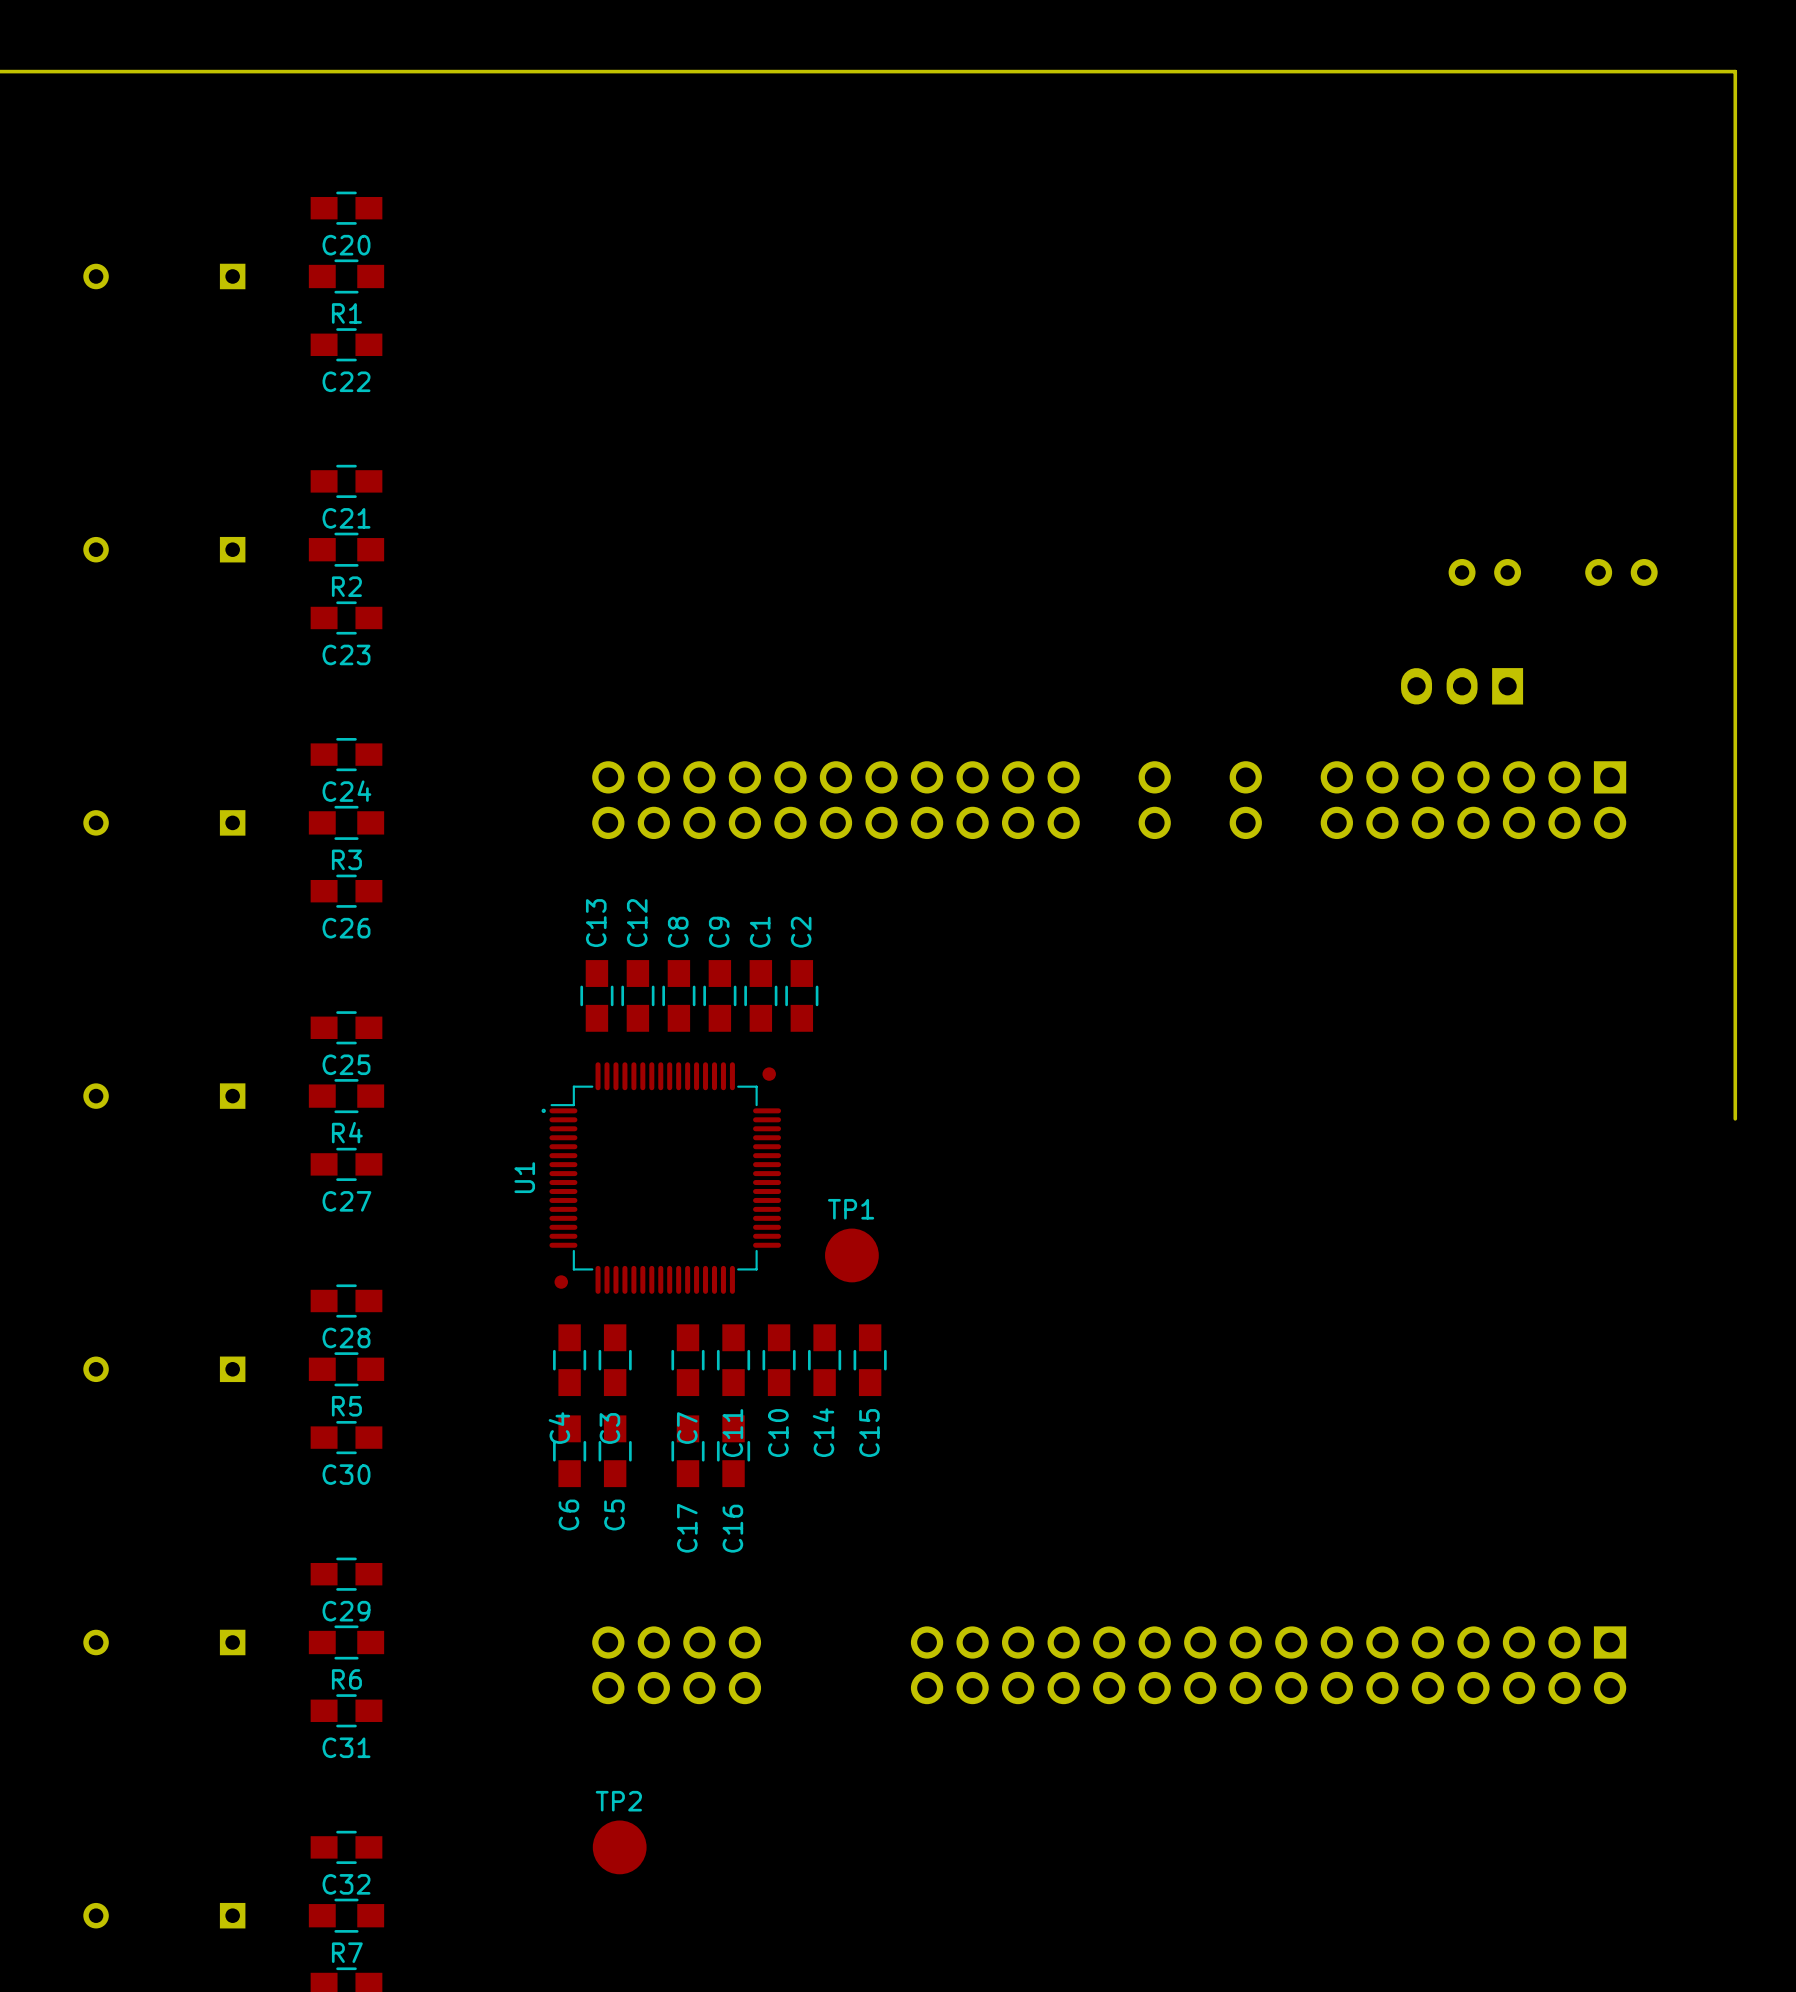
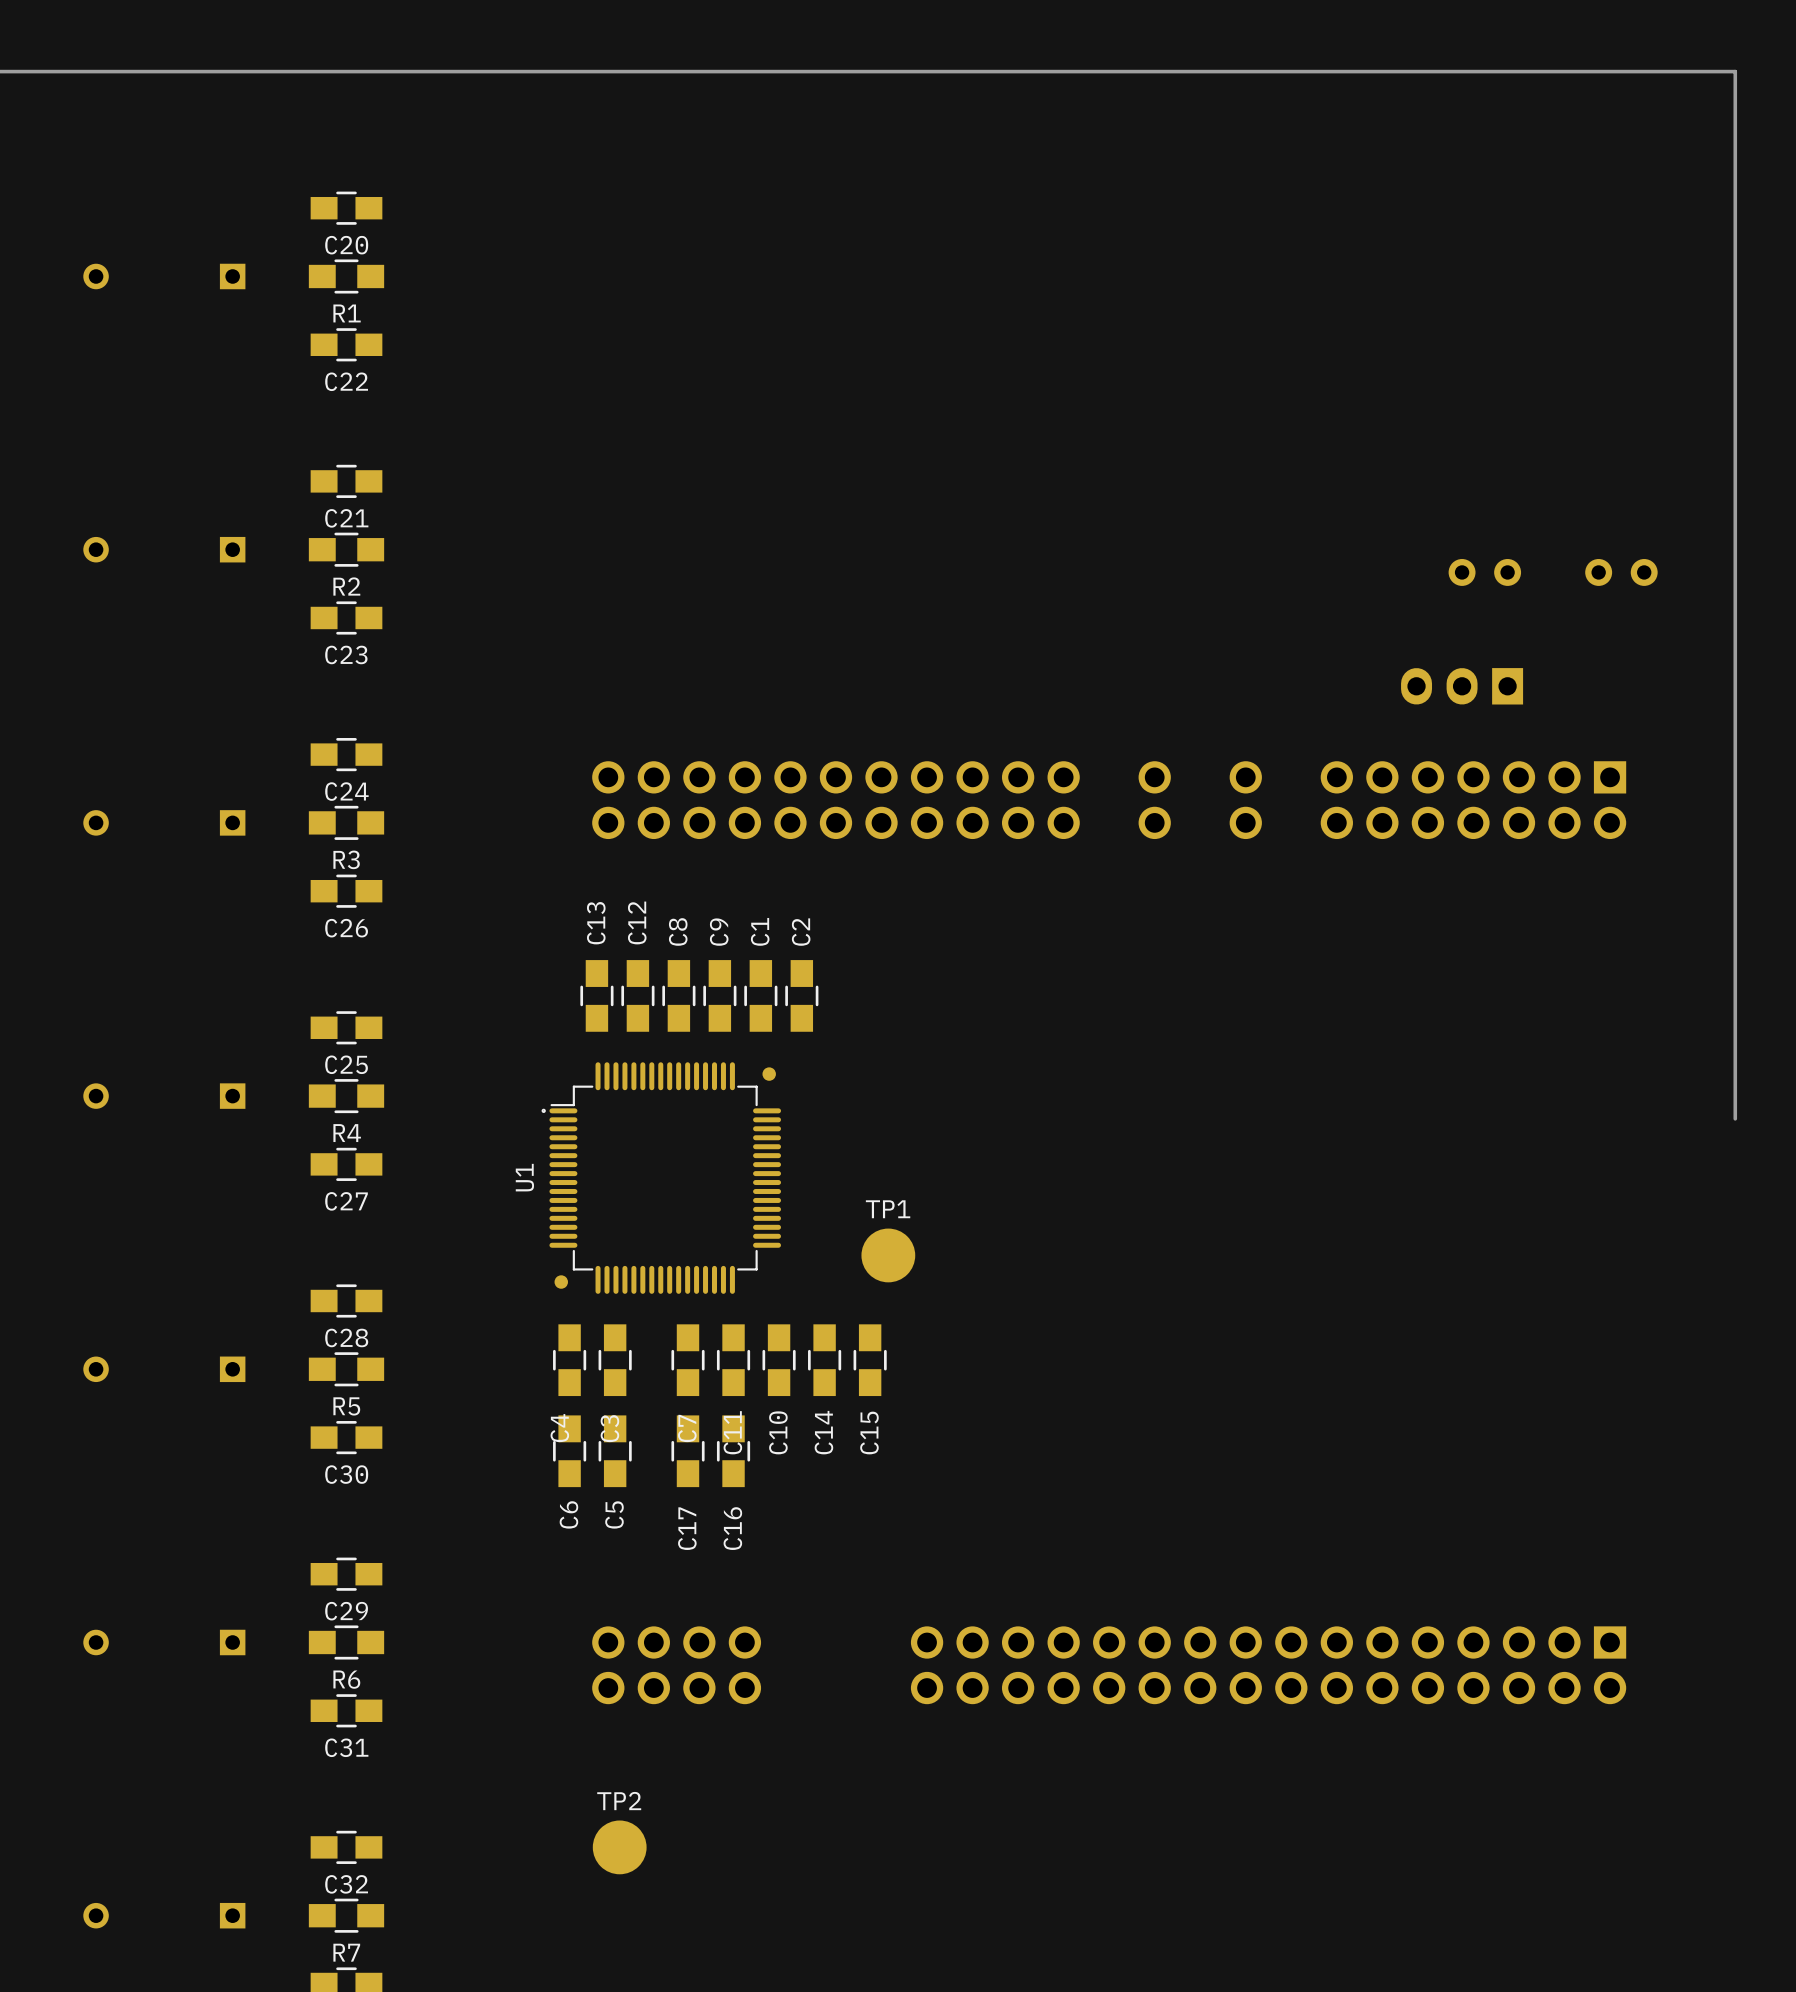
TP1 position: (851, 1255) -> (888, 1255)

